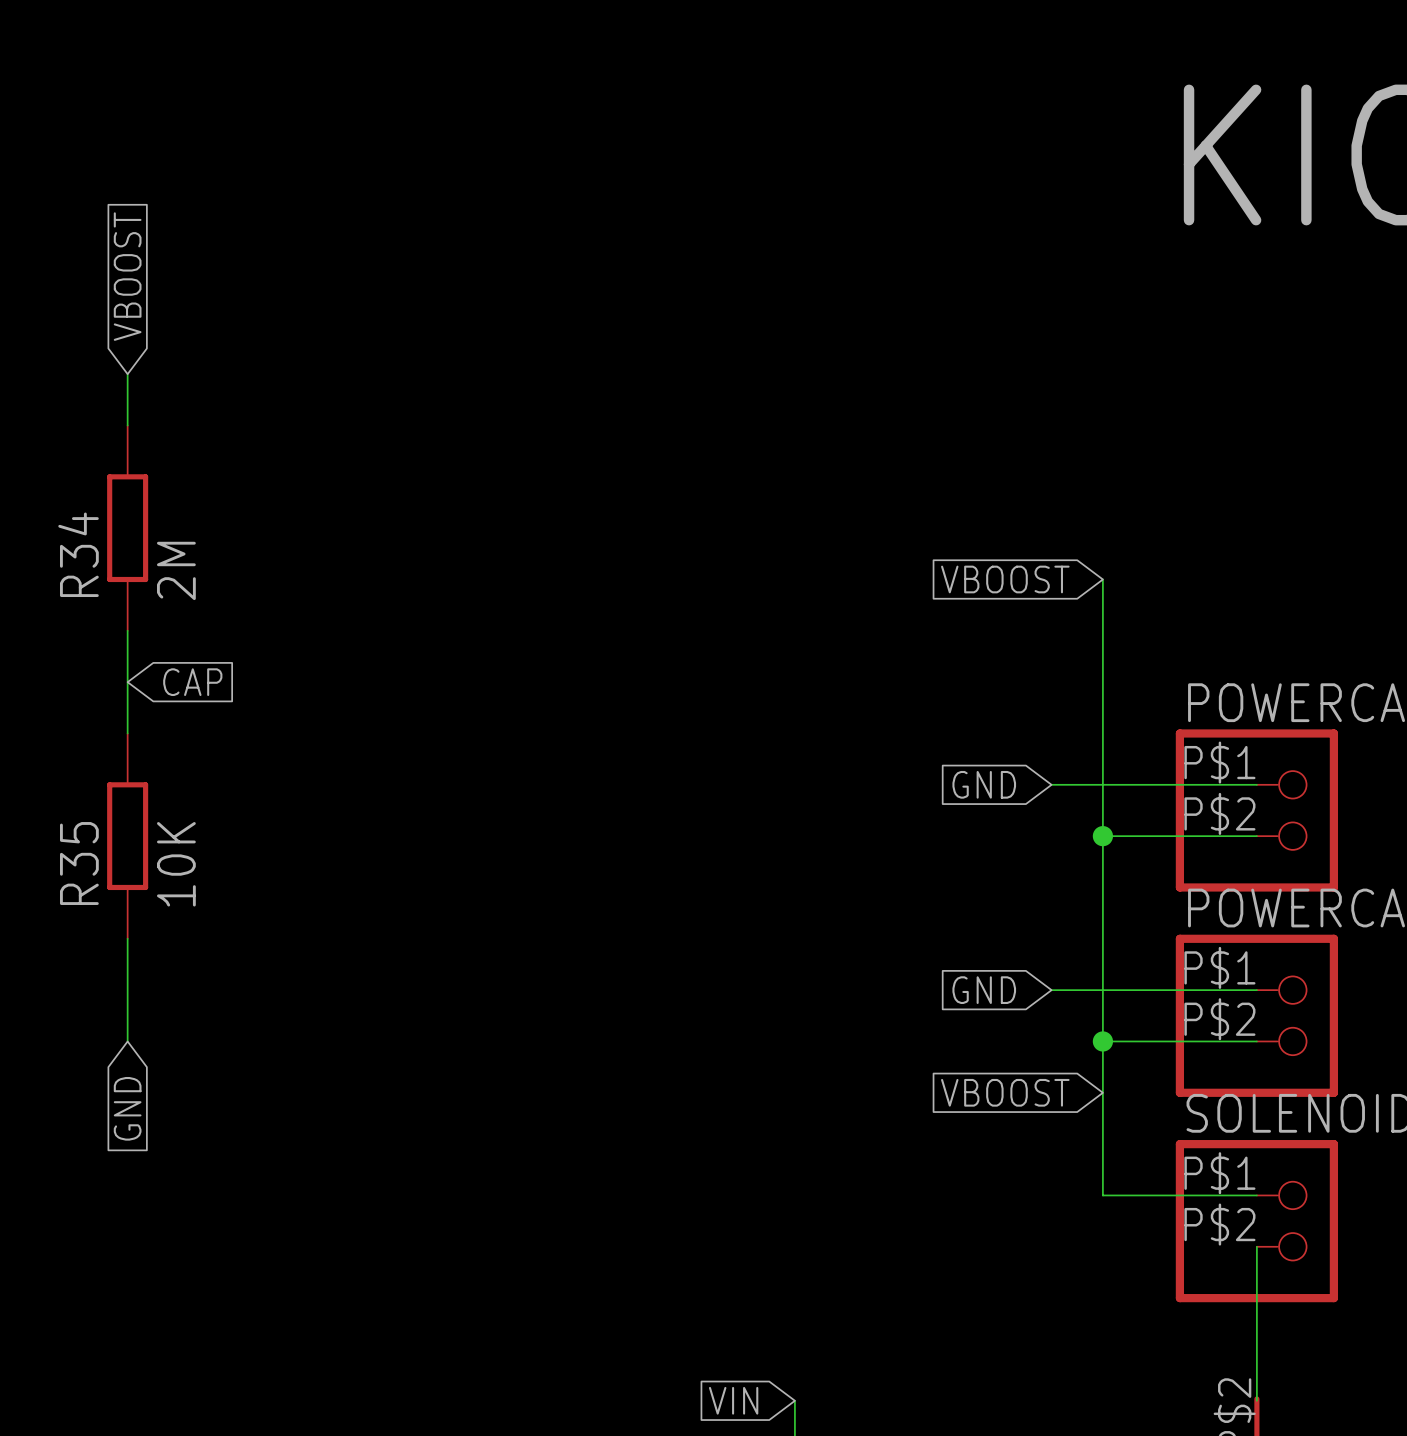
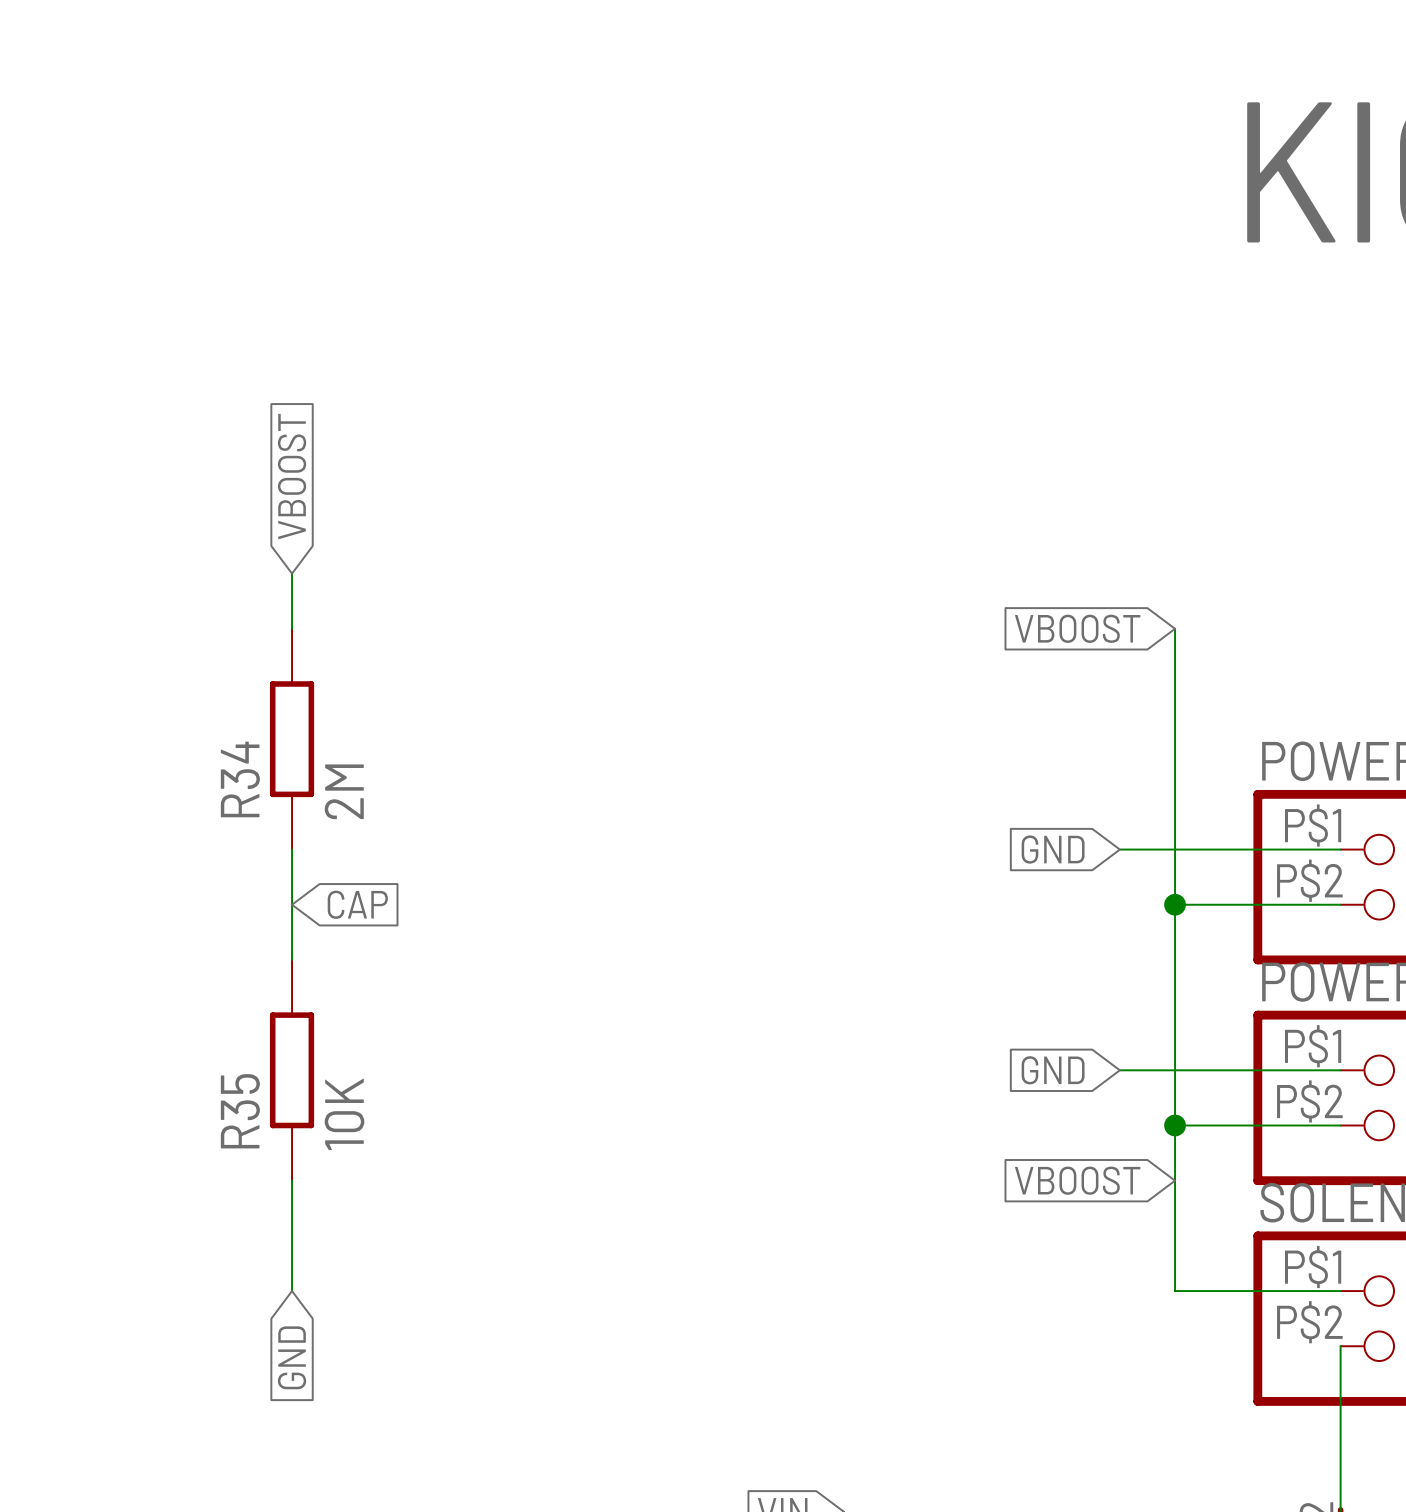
global label position: VBOOST (127, 276) -> VBOOST (292, 476)
wire: (127, 374) (127, 425) -> (292, 573) (292, 628)
R34 position: (127, 528) -> (292, 739)
wire: (127, 630) (127, 733) -> (292, 1180) (292, 1291)
global label position: CAP (192, 682) -> CAP (357, 904)
R35 position: (127, 836) -> (292, 1070)
wire: (127, 938) (127, 1041) -> (292, 849) (292, 959)
global label position: GND (127, 1108) -> GND (292, 1357)

